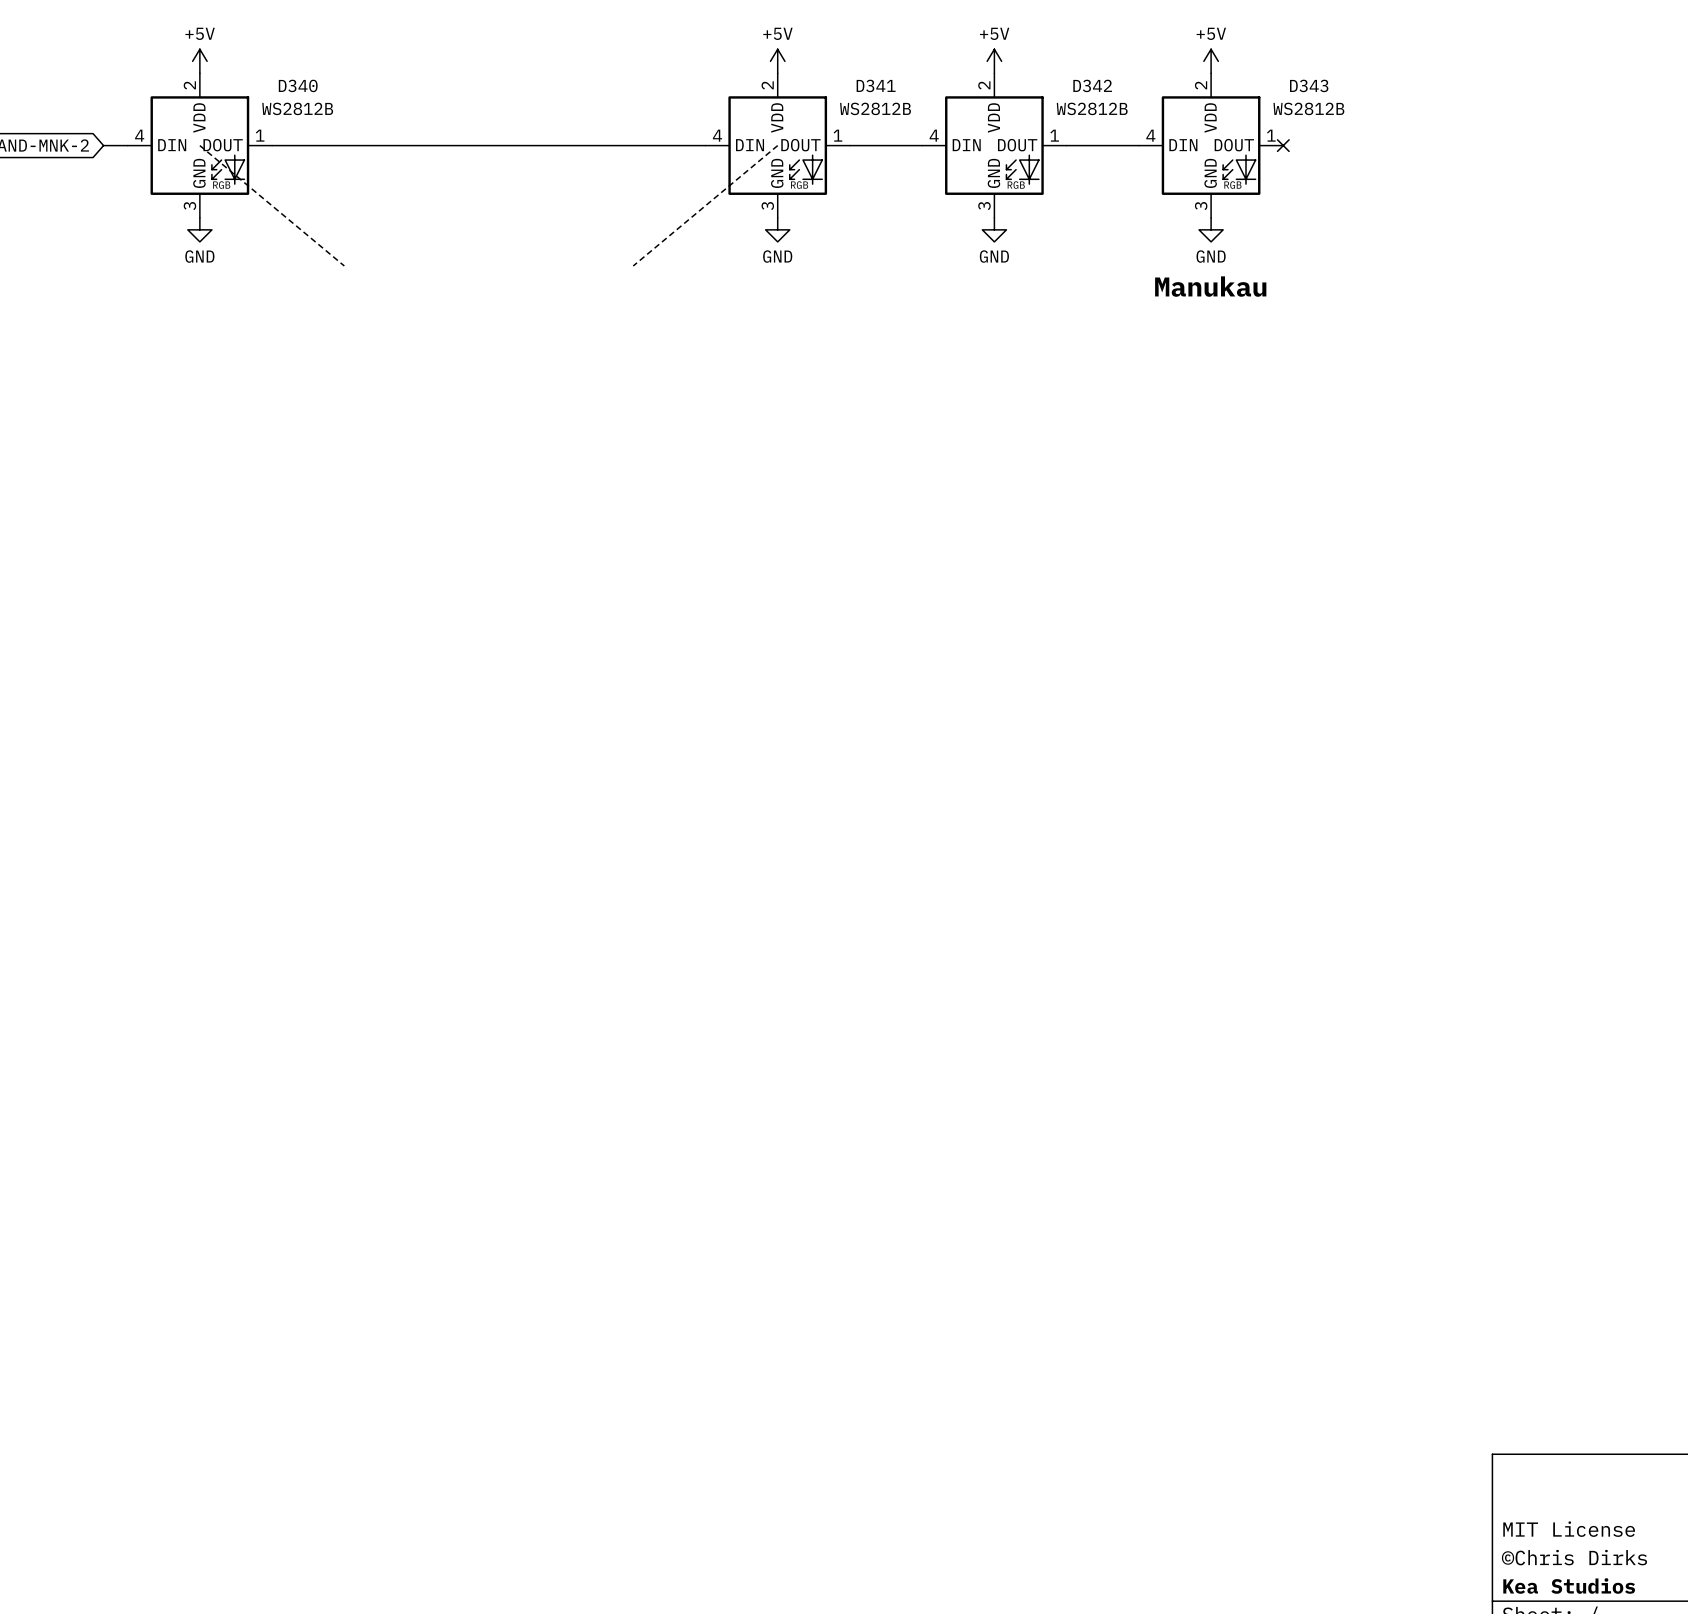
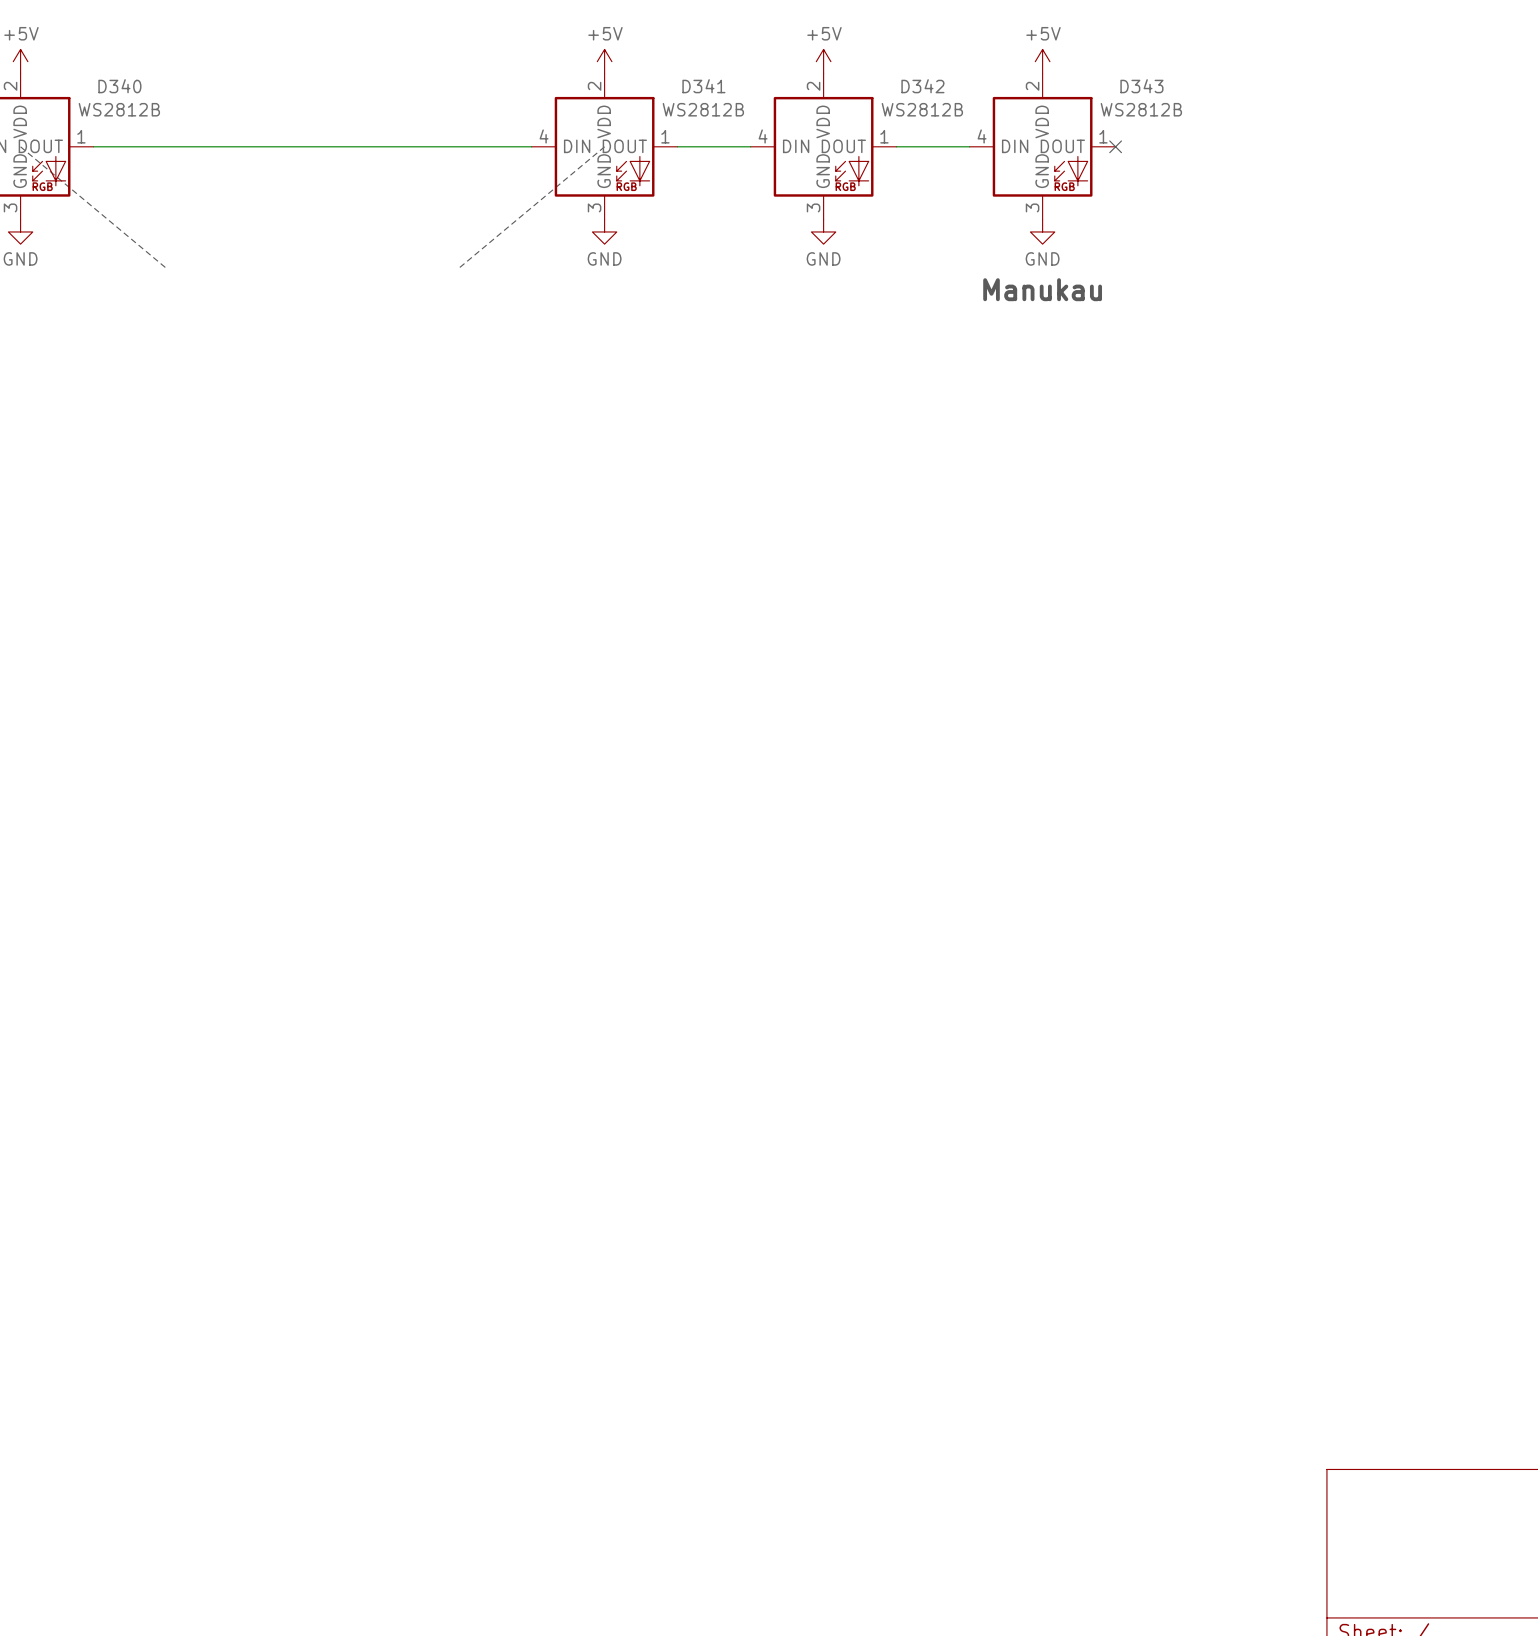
title block: MIT License (1569, 1529) -> none
title block: ©Chris Dirks (1574, 1557) -> none
title block: Kea Studios (1569, 1586) -> none

